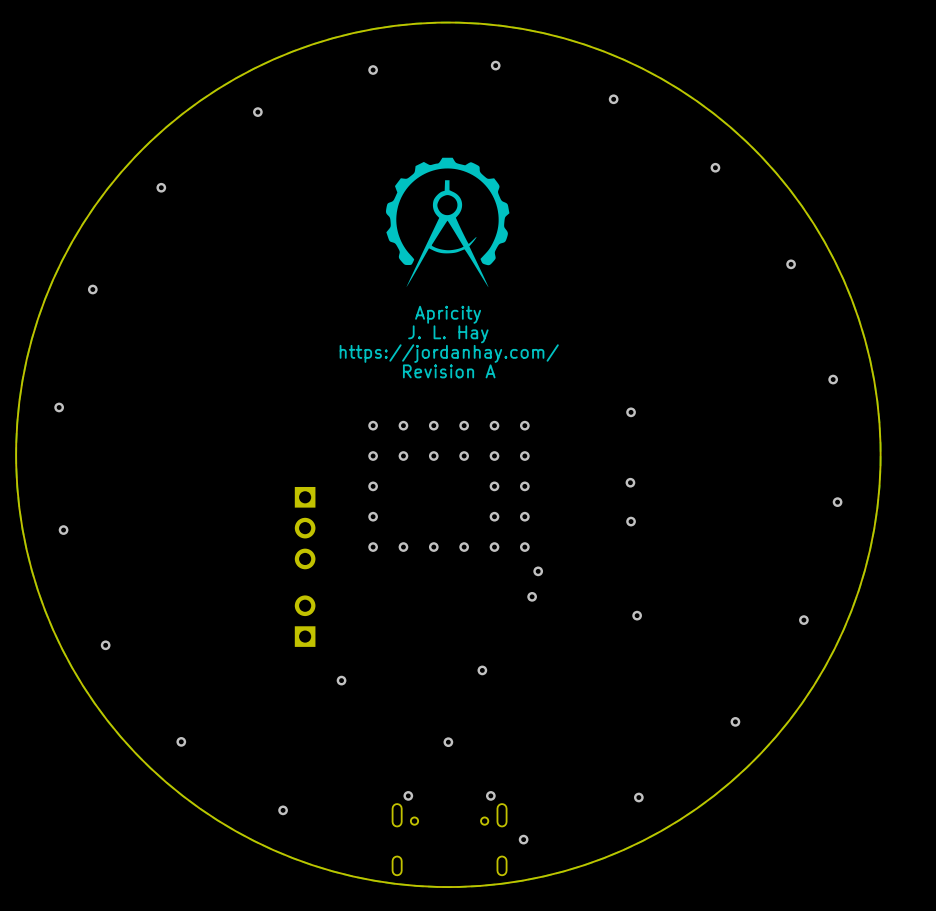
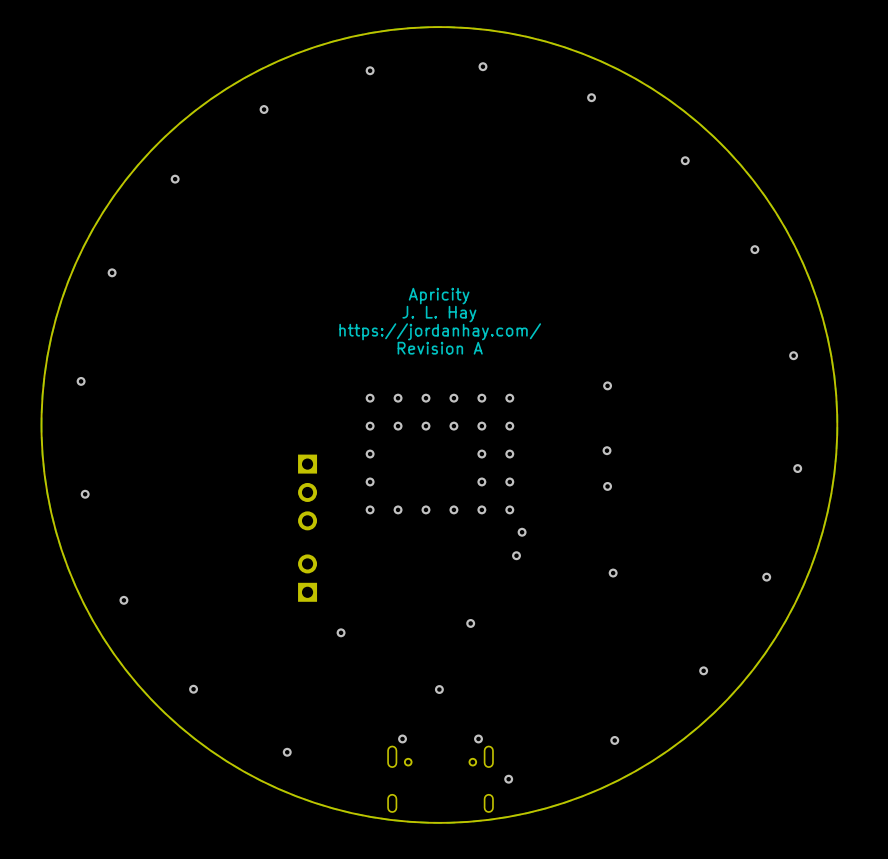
drawing: [386, 157, 510, 288] -> none

